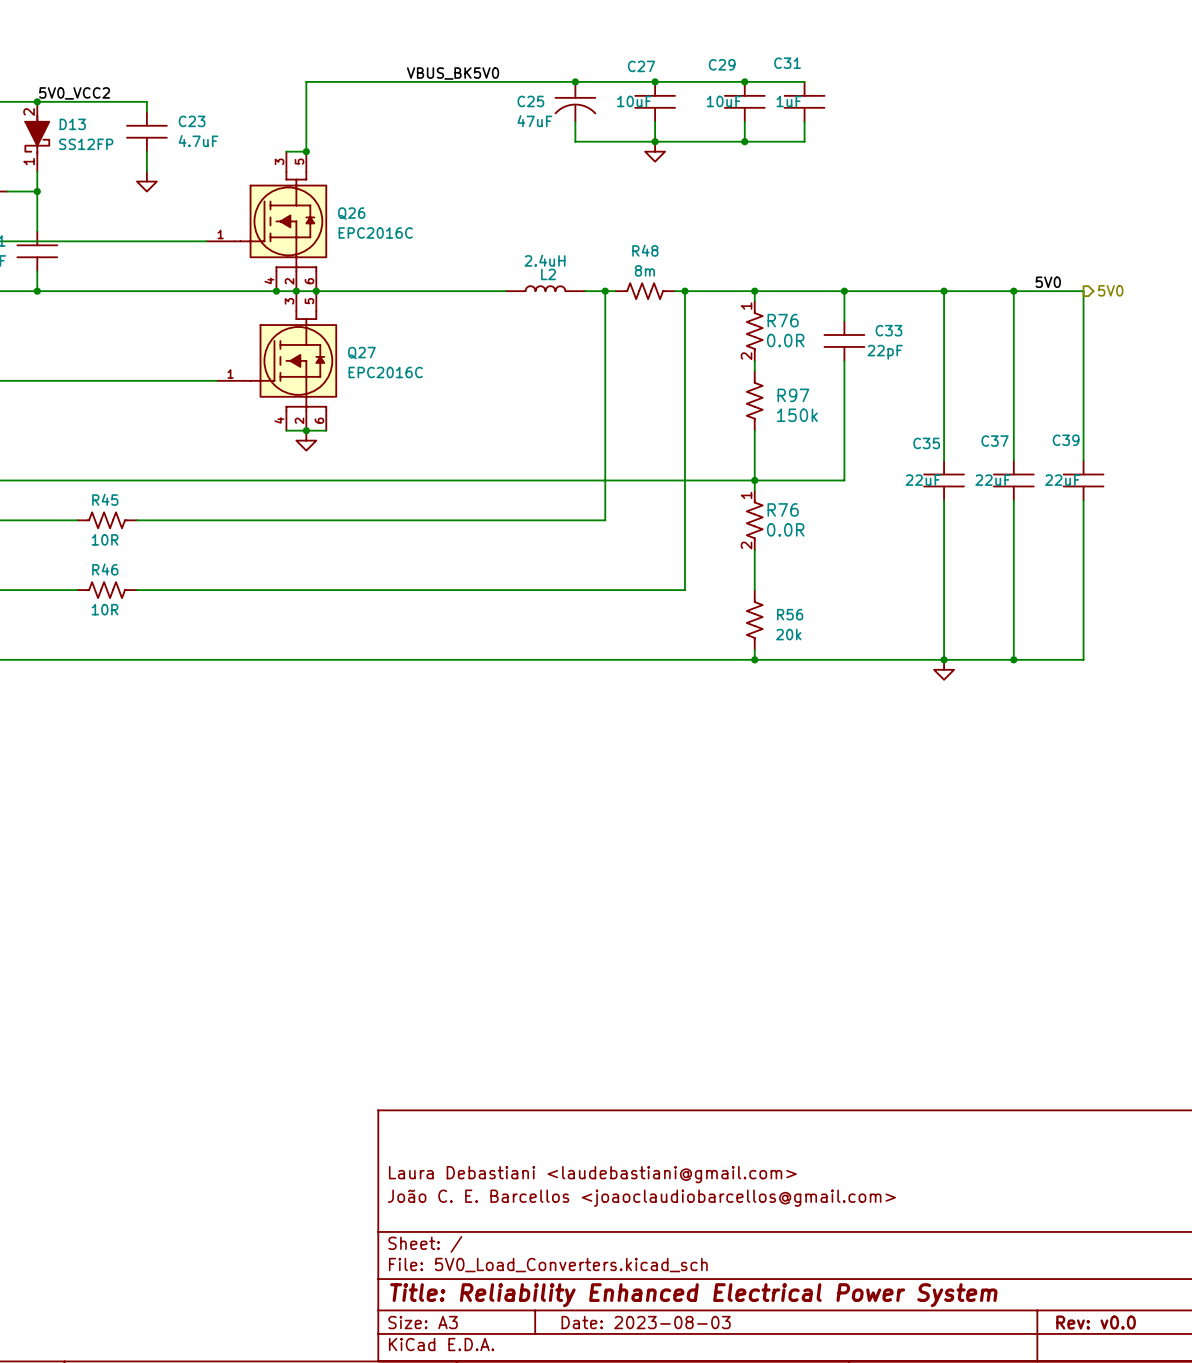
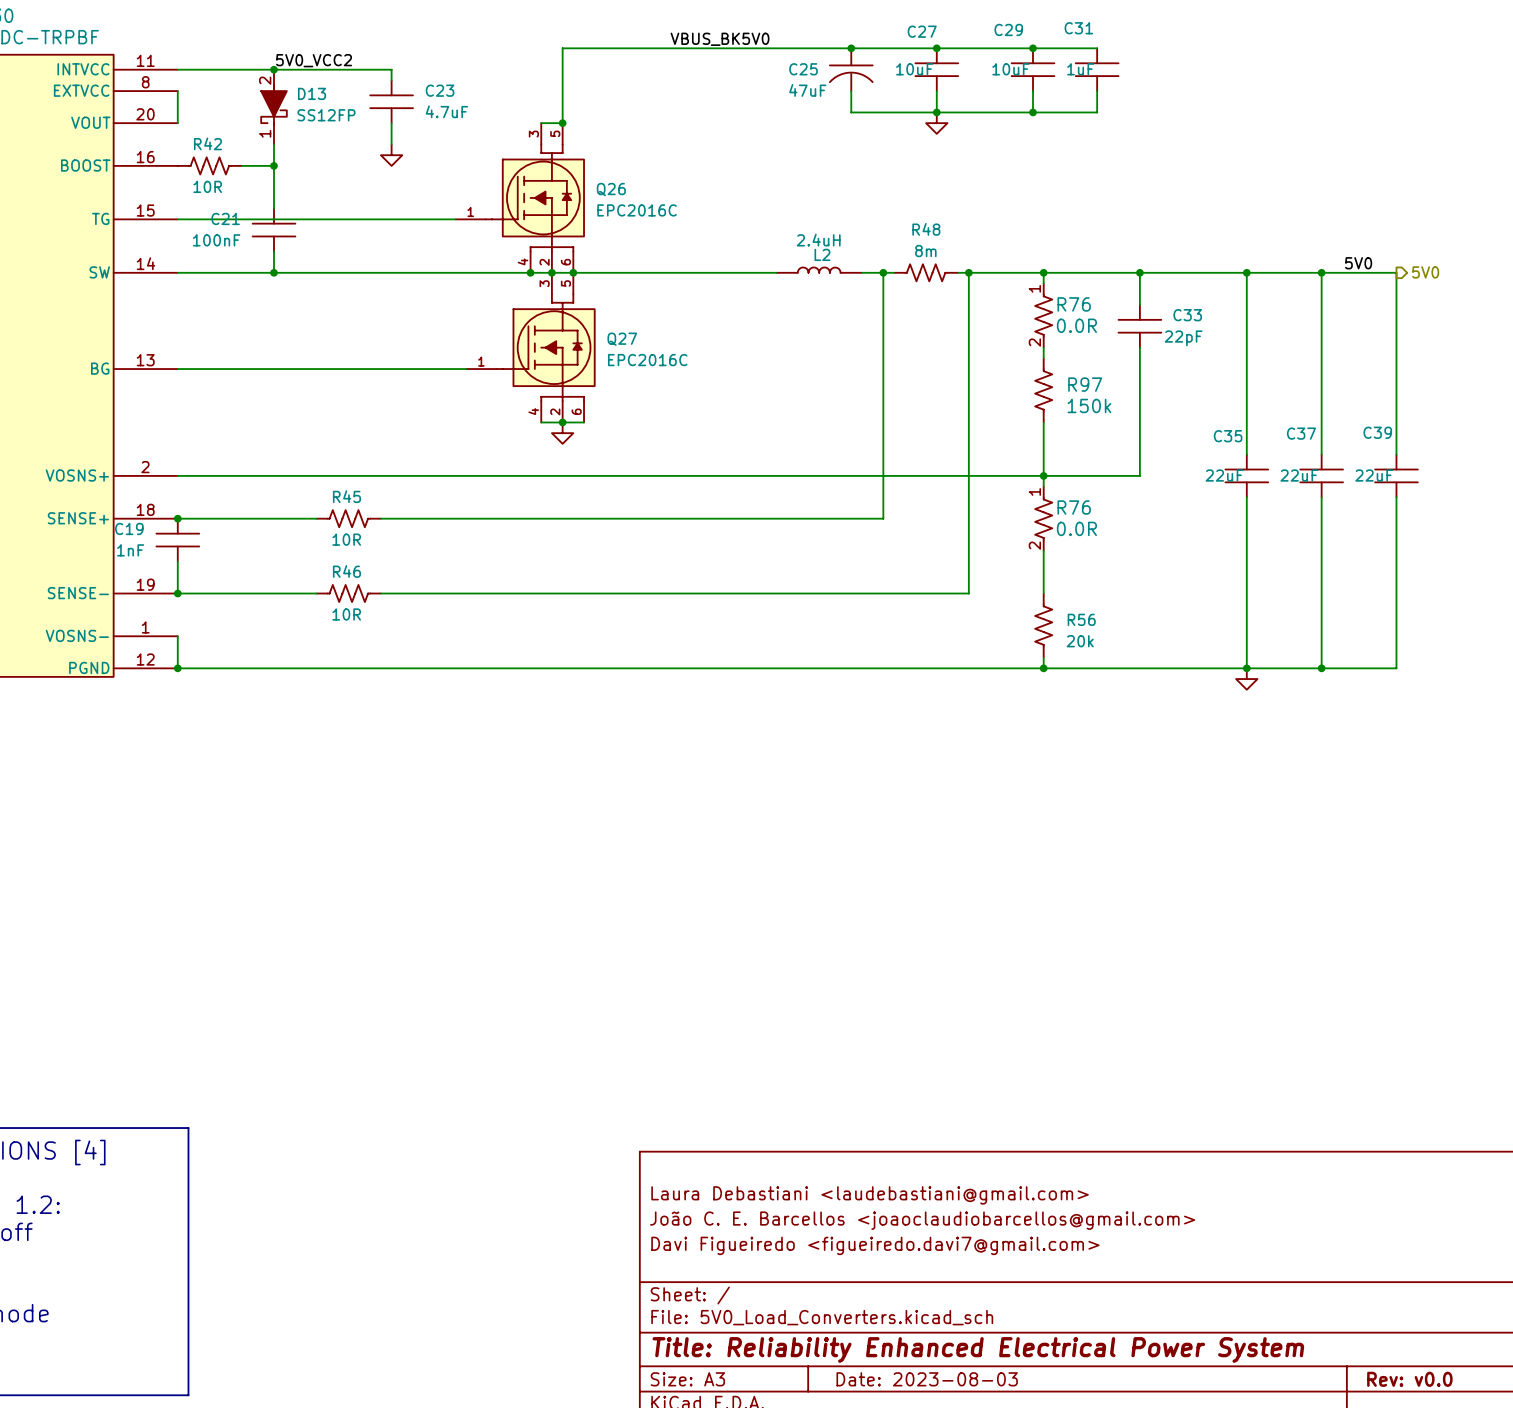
title block: none -> Laura Debastiani <laudebastiani@gmail.com> (870, 1195)
title block: Laura Debastiani <laudebastiani@gmail.com> (592, 1174) -> João C. E. Barcellos <joaoclaudiobarcellos@gmail.com> (922, 1220)
title block: João C. E. Barcellos <joaoclaudiobarcellos@gmail.com> (641, 1198) -> Davi Figueiredo <figueiredo.davi7@gmail.com> (875, 1245)

